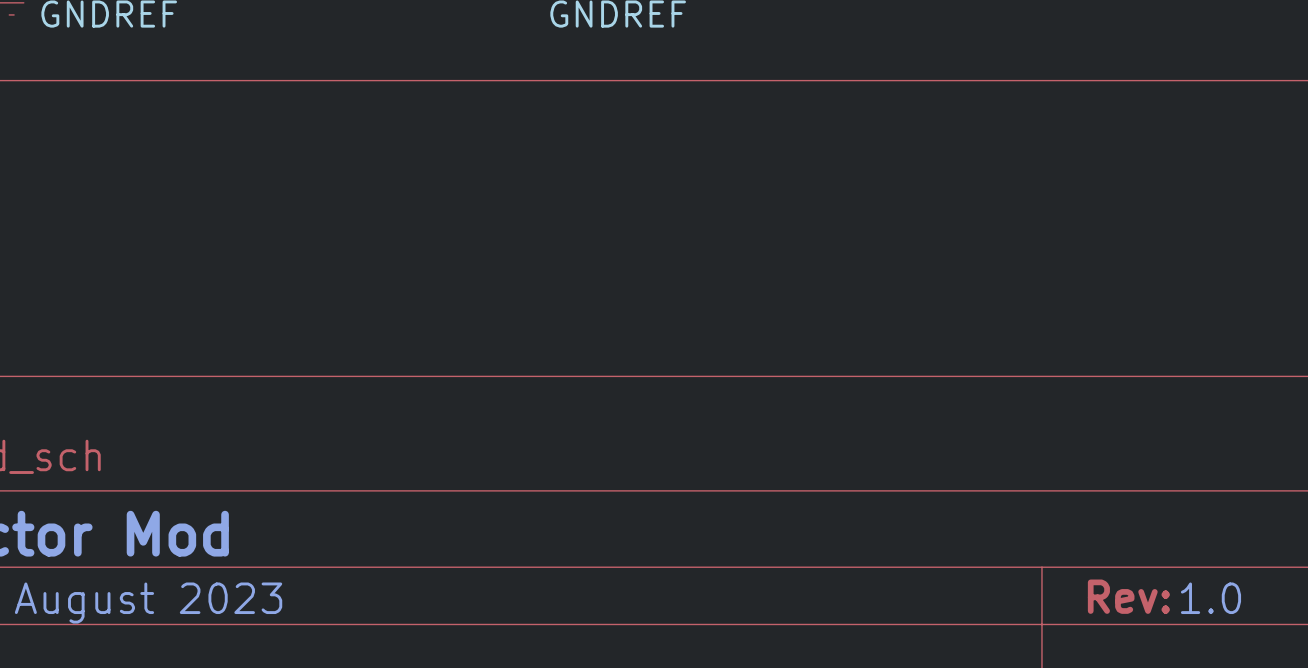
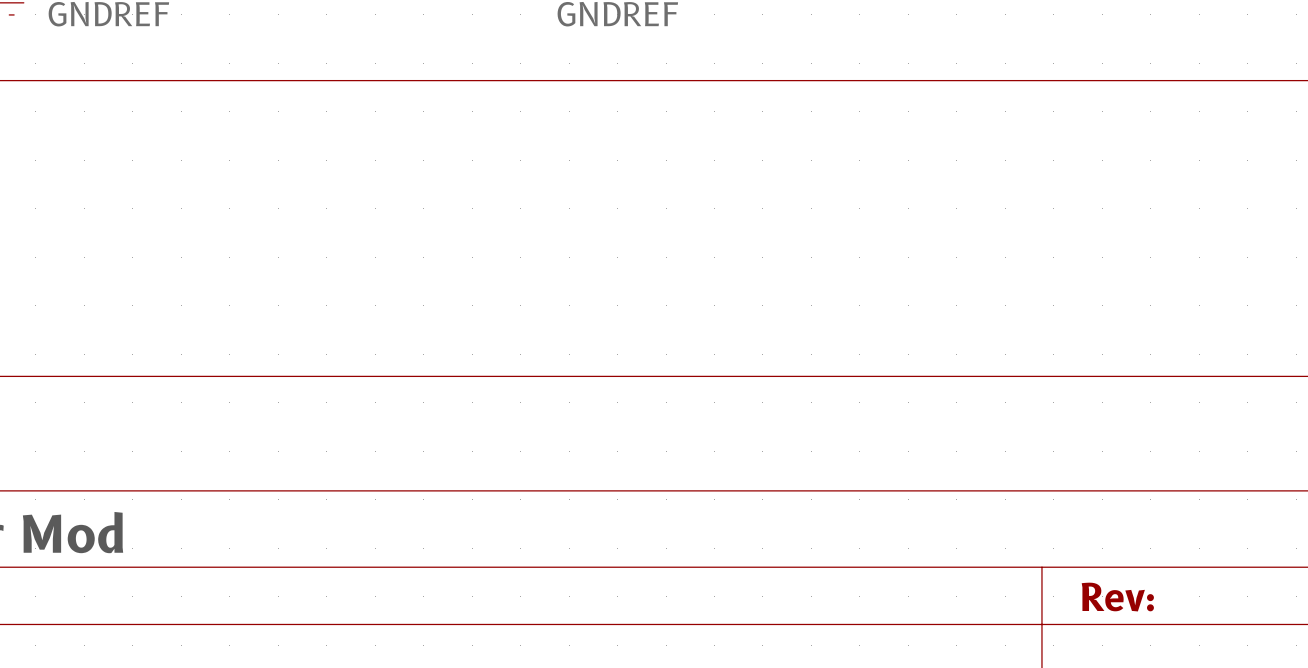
text: 1.0 (1210, 598) -> none
text: August 2023 (148, 603) -> none

